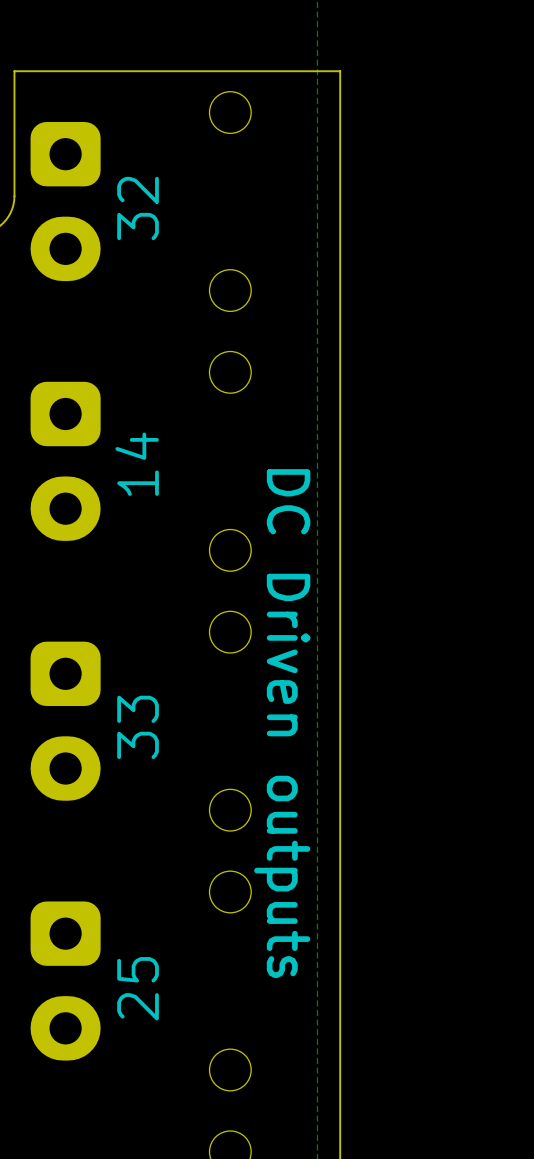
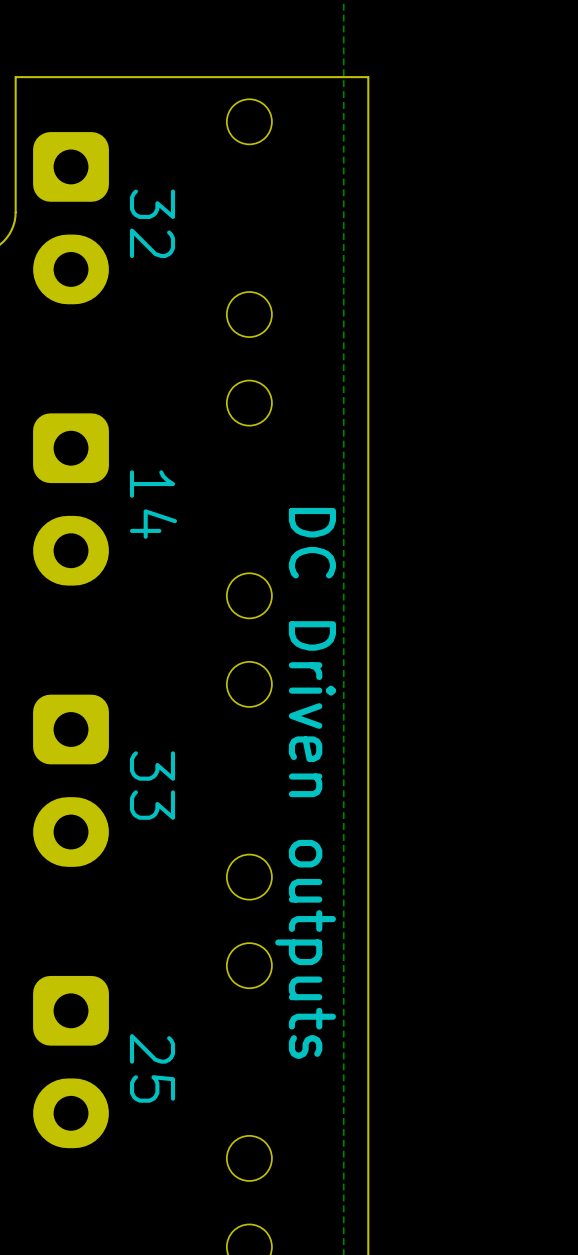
text rotation: 0° (138, 208) -> 180° (152, 223)
text rotation: 0° (137, 464) -> 180° (153, 504)
text rotation: 0° (138, 727) -> 180° (152, 785)
text rotation: 0° (138, 988) -> 180° (152, 1068)

